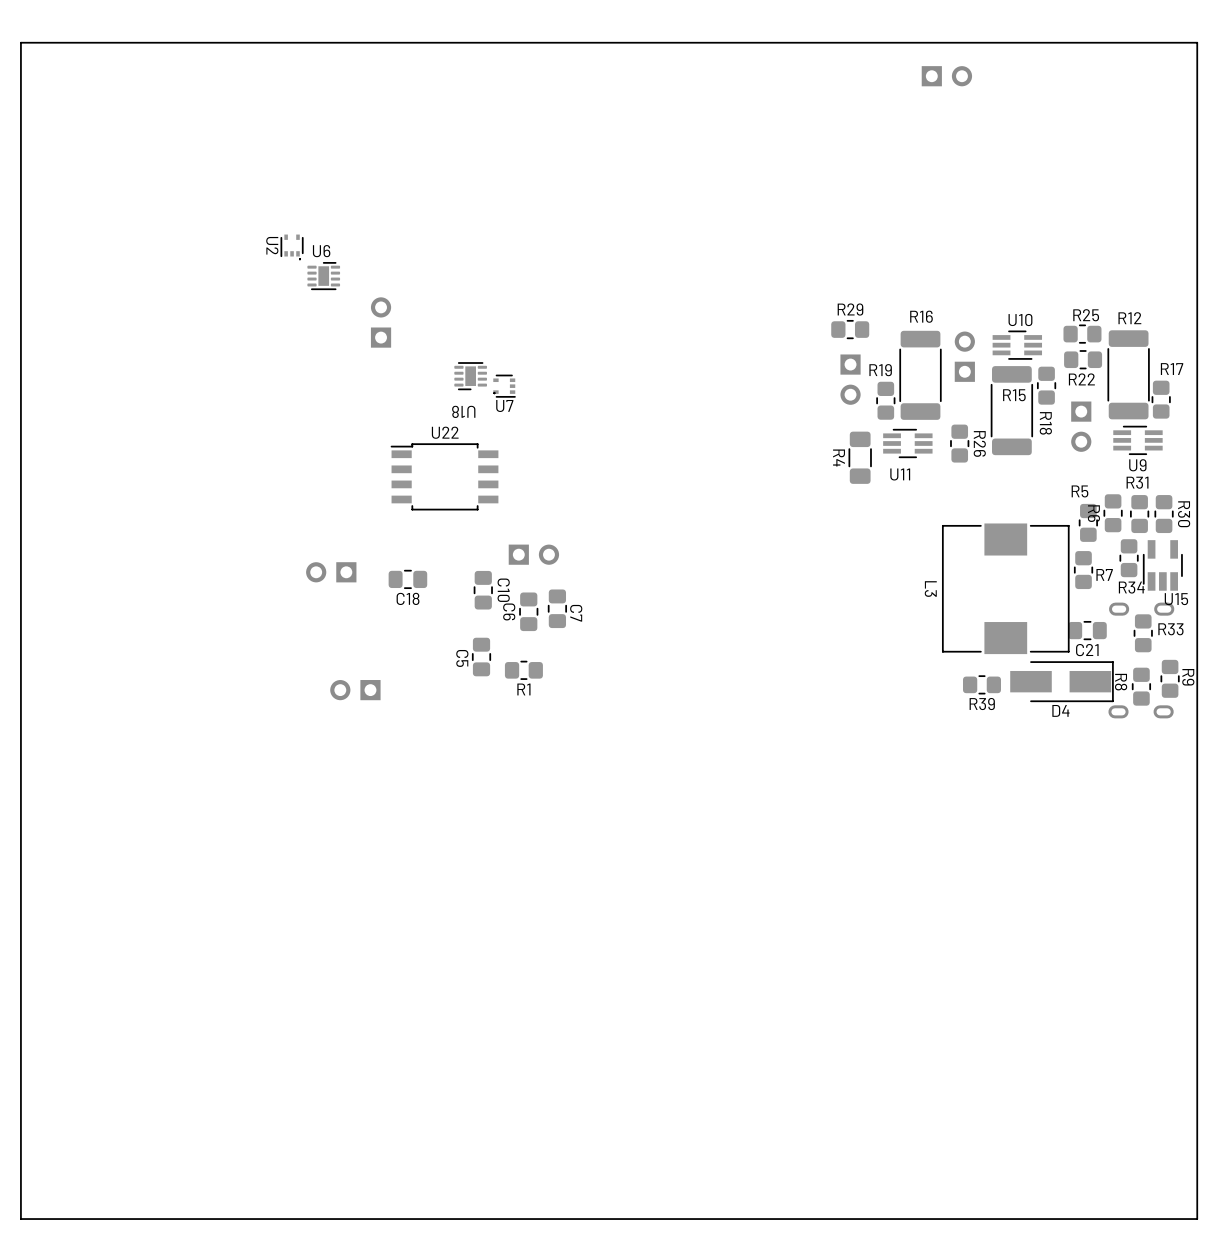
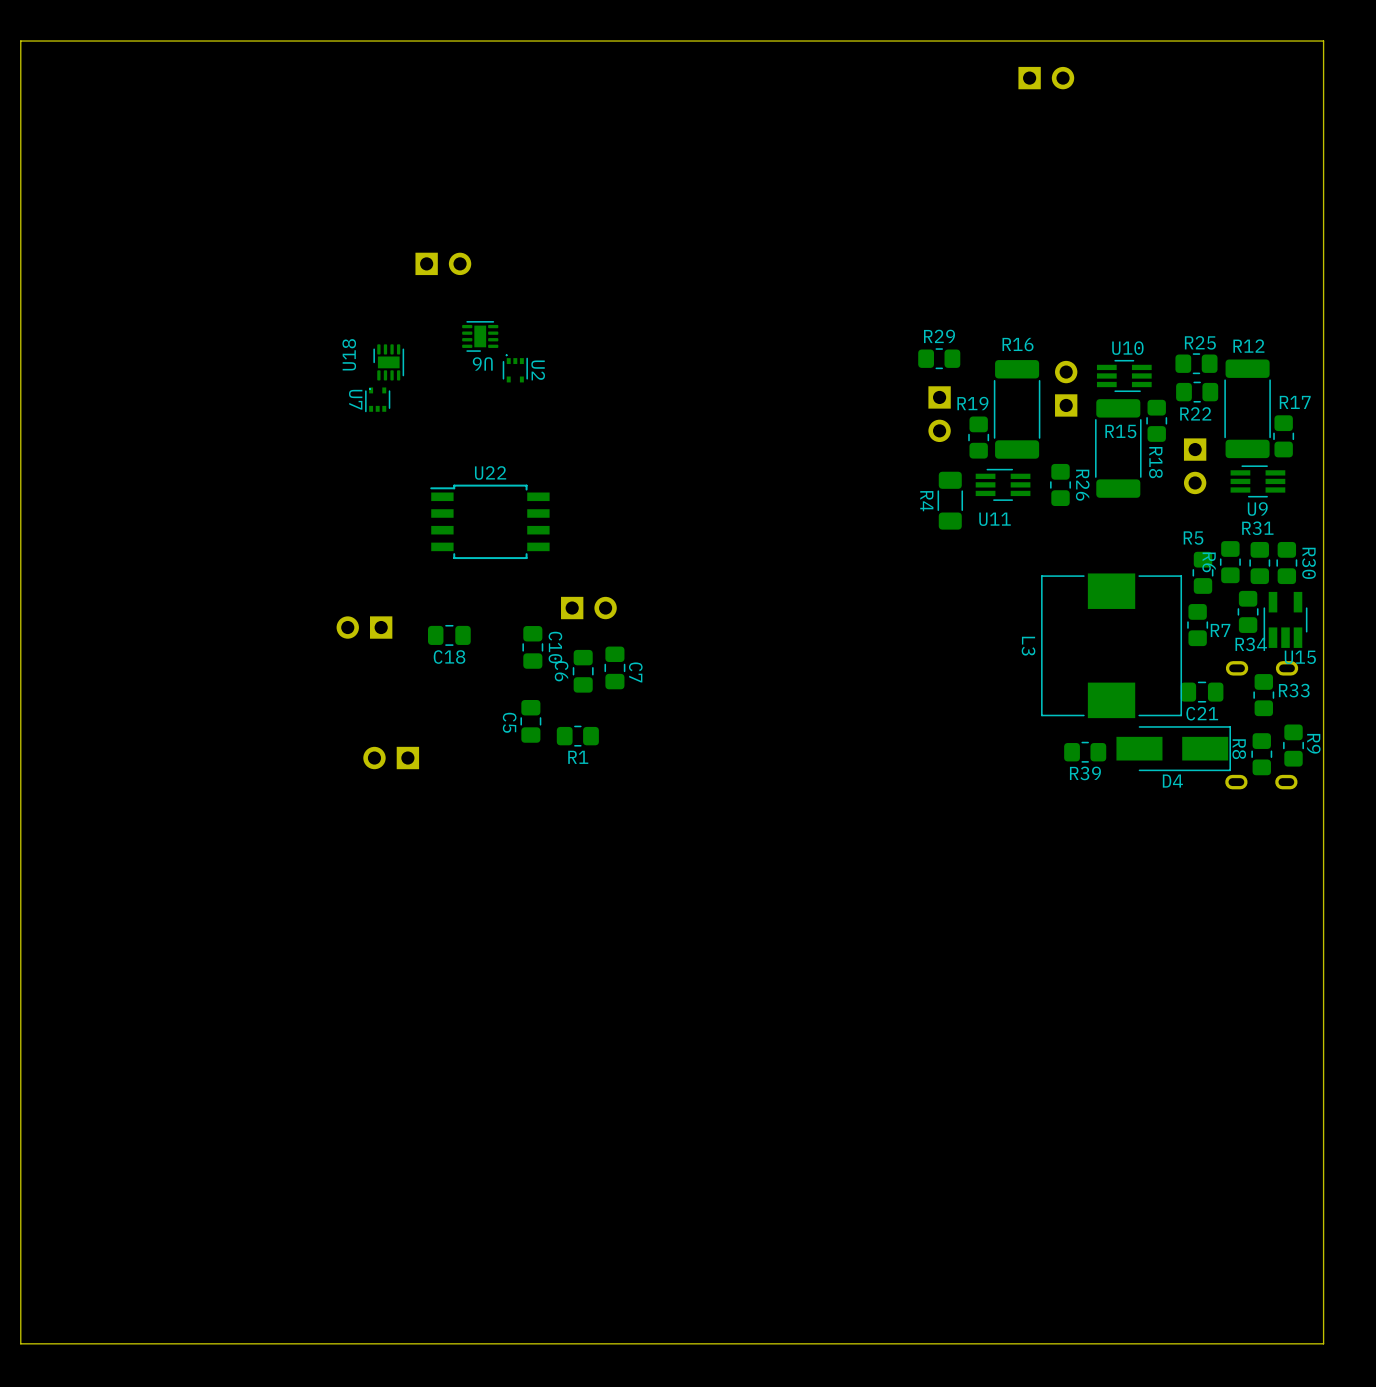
U2 rotation: 0° (292, 245) -> 180° (515, 370)
U2 position: (292, 245) -> (515, 370)
U6 rotation: 0° (319, 273) -> 180° (485, 339)
U6 position: (319, 273) -> (485, 339)
part rotation: 0° (381, 322) -> 90° clockwise (443, 263)
part position: (381, 322) -> (443, 263)
U18 rotation: 0° (475, 378) -> 90° clockwise (385, 367)
U18 position: (475, 378) -> (385, 367)
U7 rotation: 0° (504, 386) -> 90° clockwise (377, 399)
U7 position: (504, 386) -> (377, 399)

